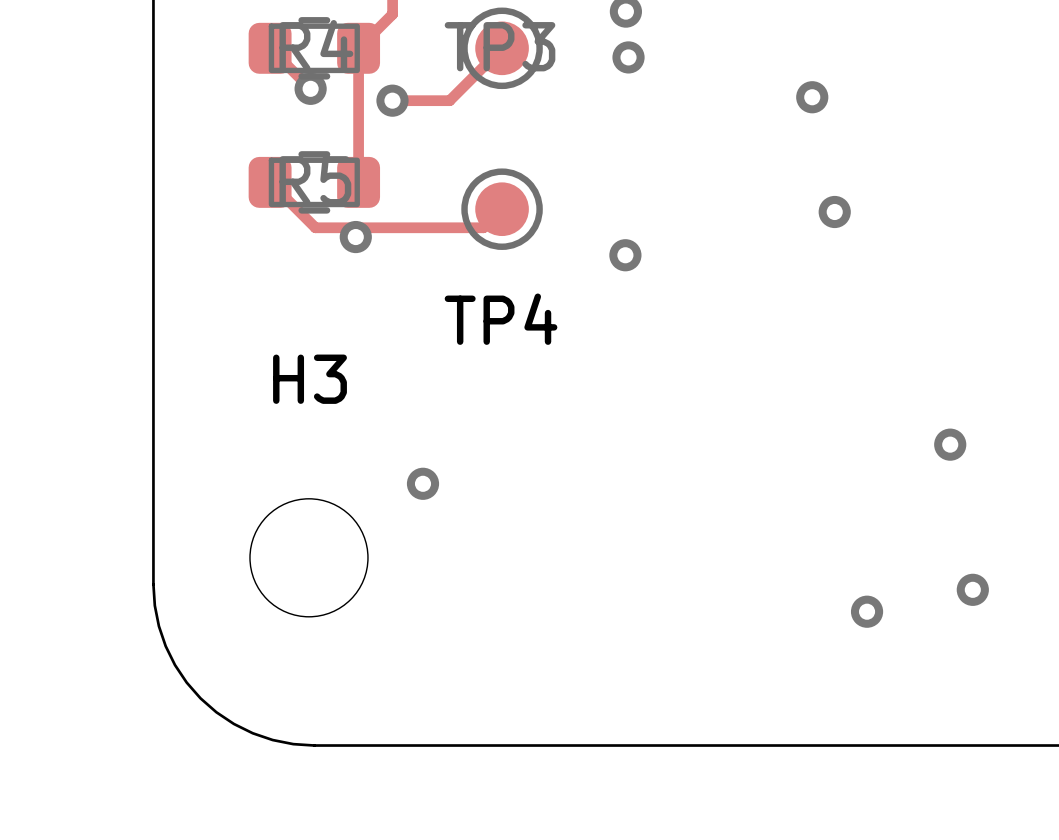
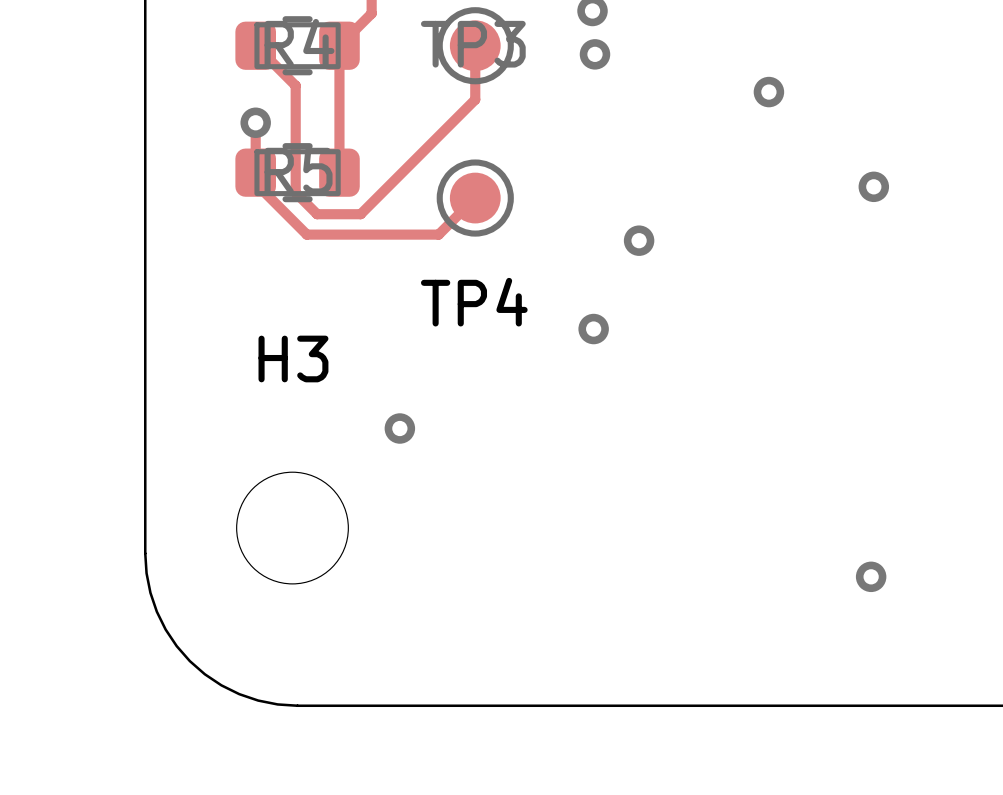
track: (502, 48) (449, 100) (392, 100) -> (475, 45) (475, 99) (360, 214) (317, 214) (295, 192) (295, 85) (294, 84)
via position: (310, 88) -> (255, 122)
via: (392, 100) -> none
track: (270, 182) (315, 227) (483, 227) -> (255, 122) (255, 183) (306, 234) (438, 234) (457, 215)
via: none -> (873, 186)
via: (834, 211) -> none
via: (355, 237) -> none
via: none -> (639, 240)
via: (625, 255) -> none
via: none -> (593, 329)
via: (950, 444) -> none
via position: (422, 483) -> (399, 428)
via: (972, 589) -> none
via: none -> (871, 576)
via: (867, 611) -> none

